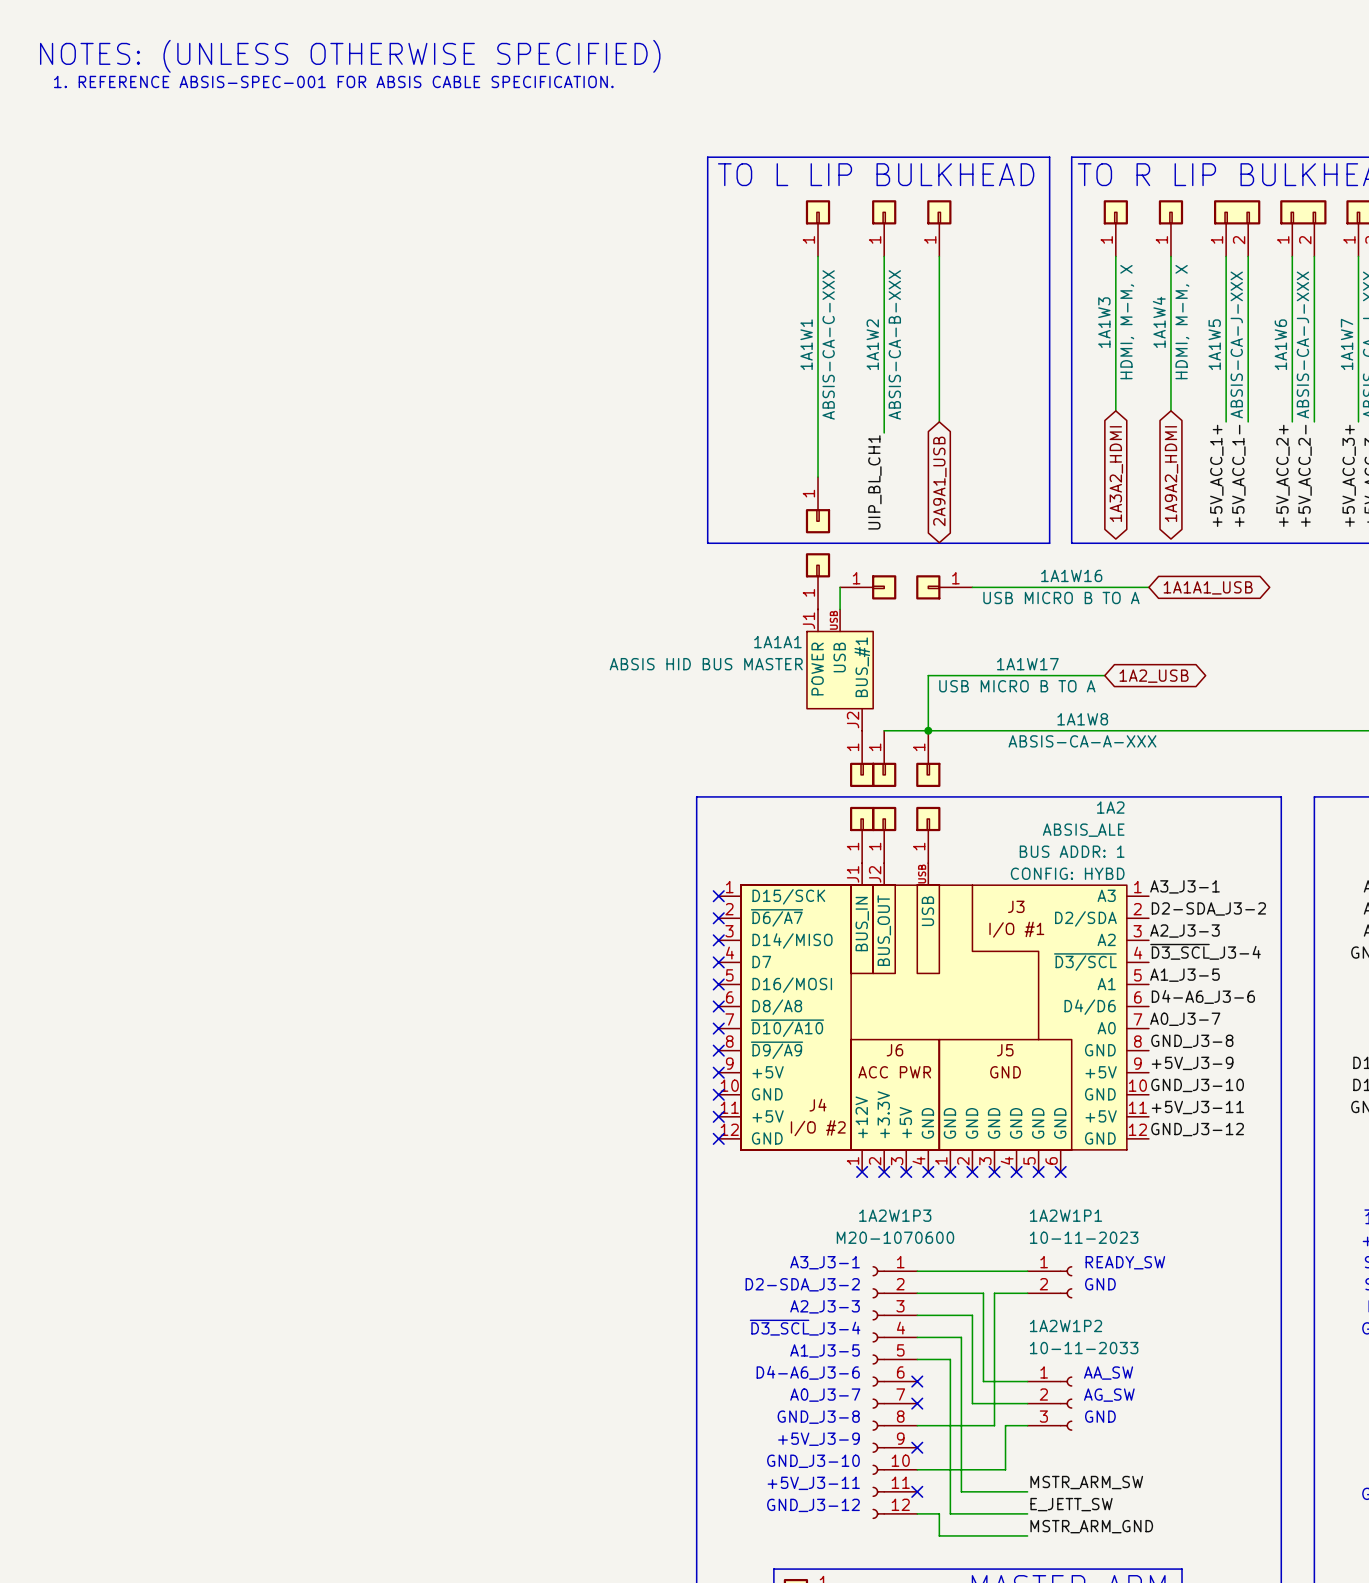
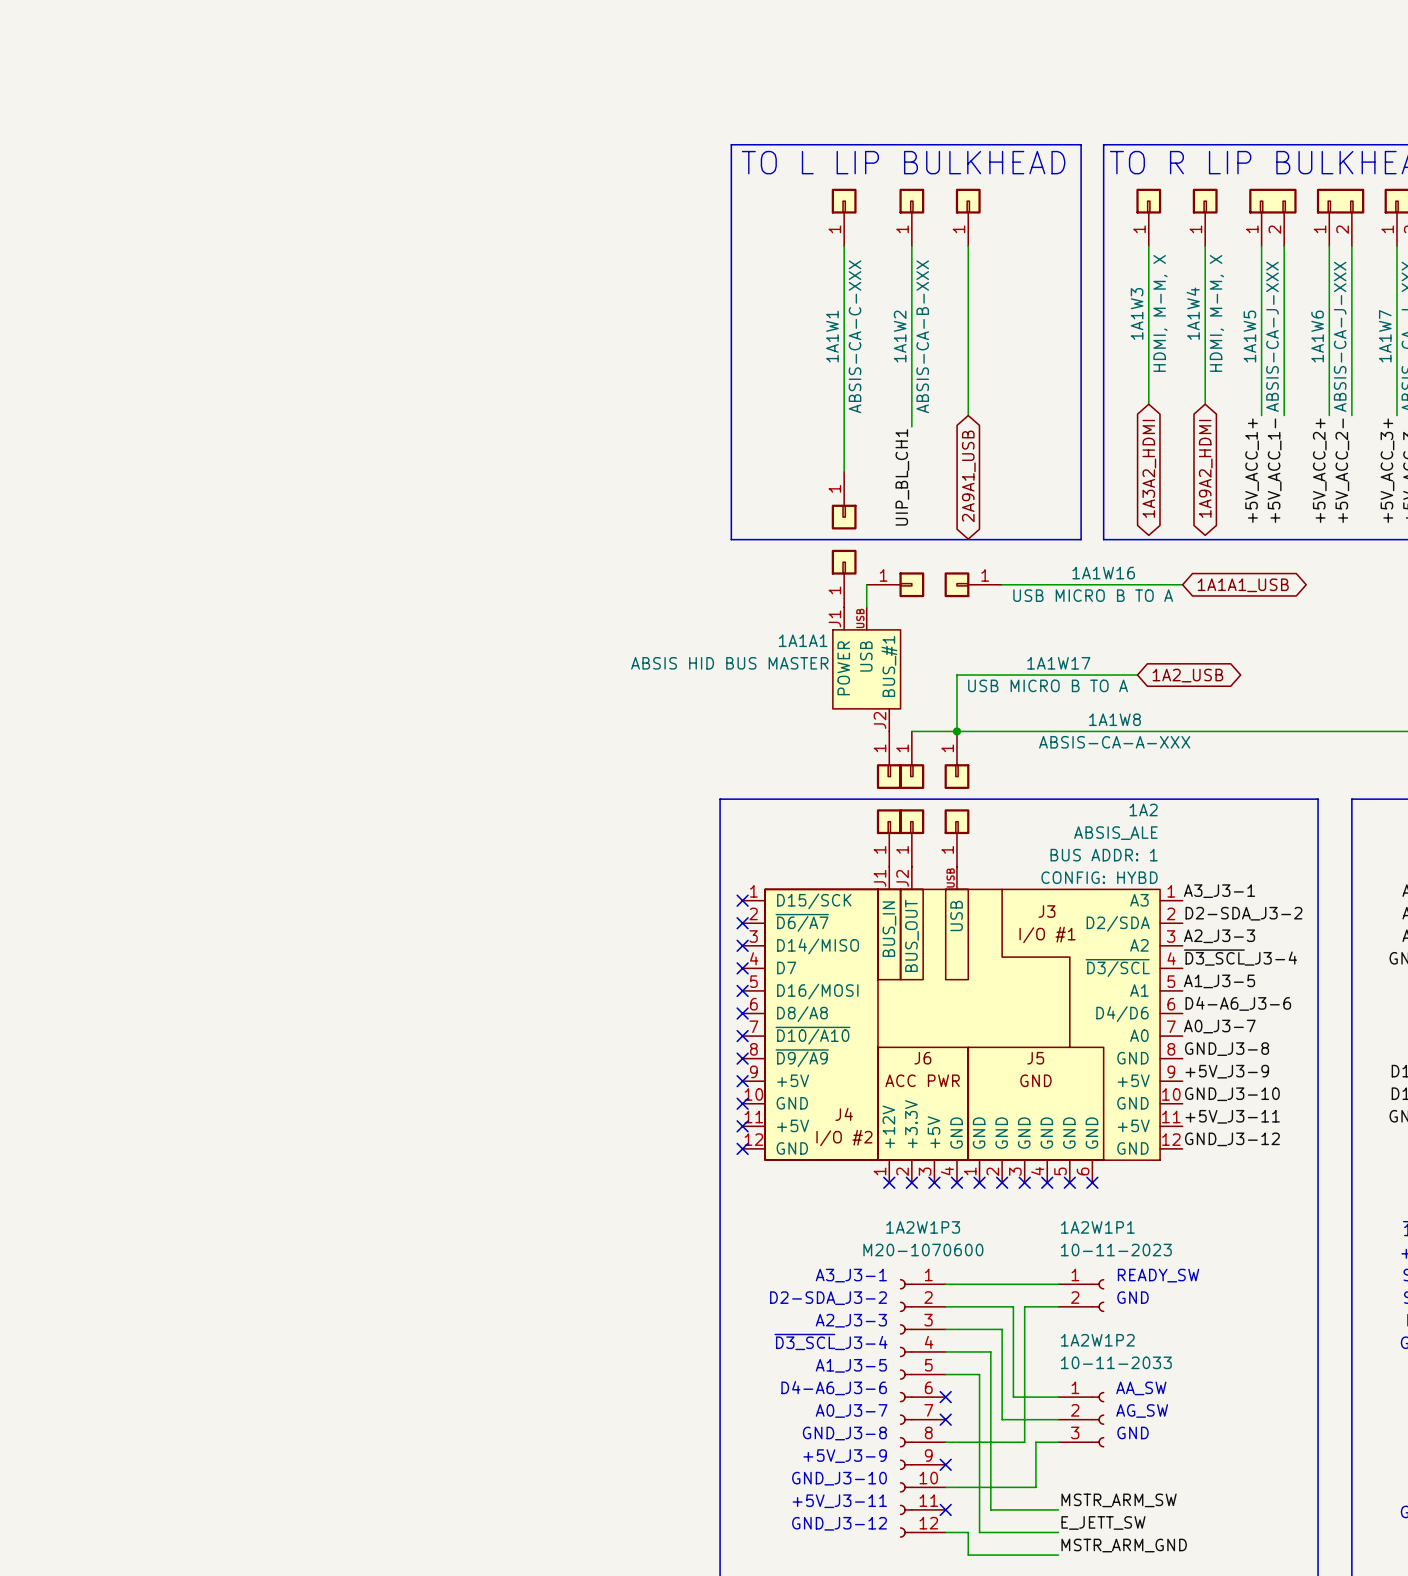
text: NOTES: (UNLESS OTHERWISE SPECIFIED) (350, 56) -> none
text: 1. REFERENCE ABSIS-SPEC-001 FOR ABSIS CABLE SPECIFICATION. (333, 81) -> none

